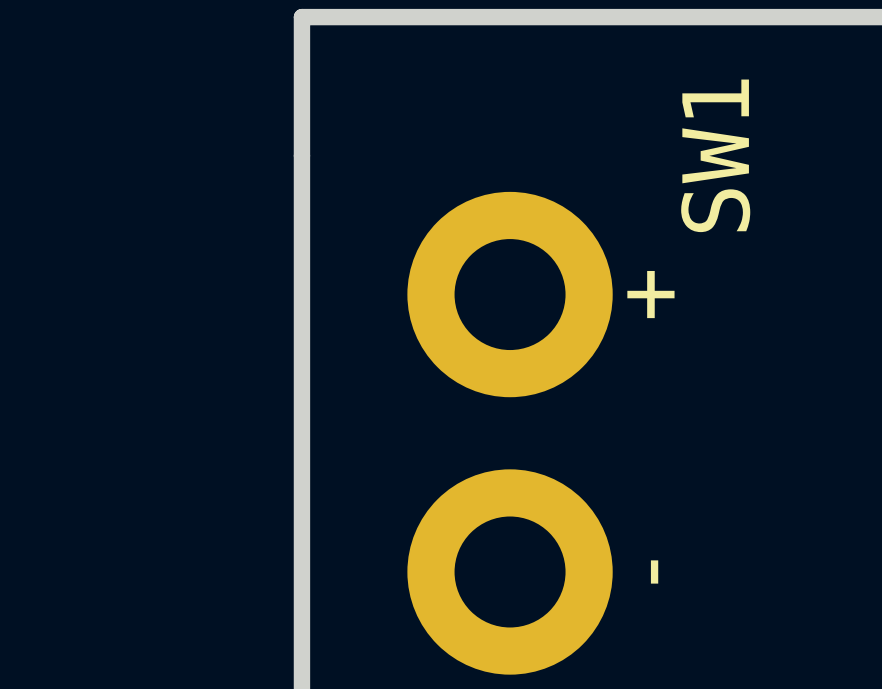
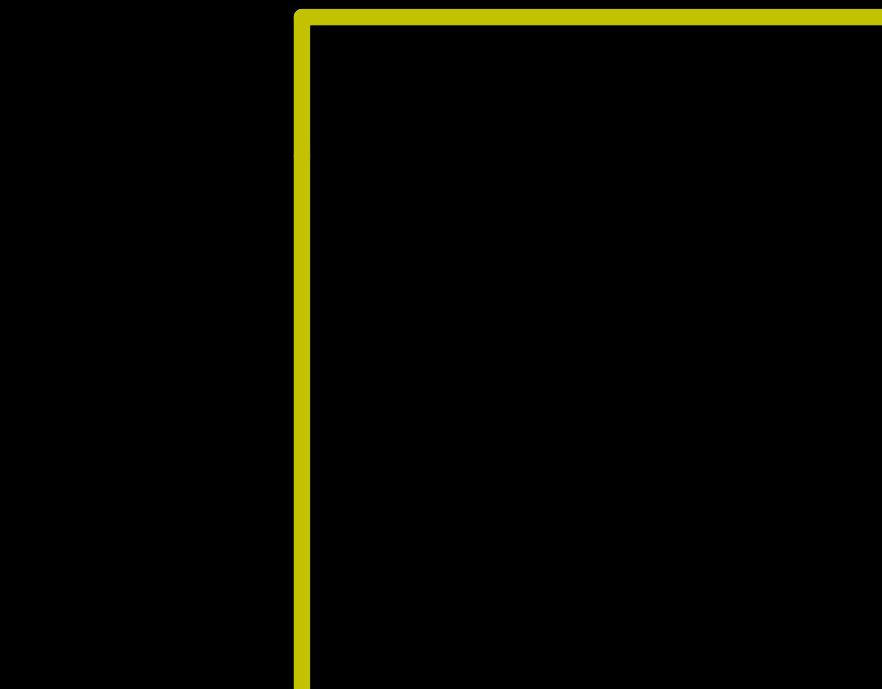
SW1: (510, 433) -> none

